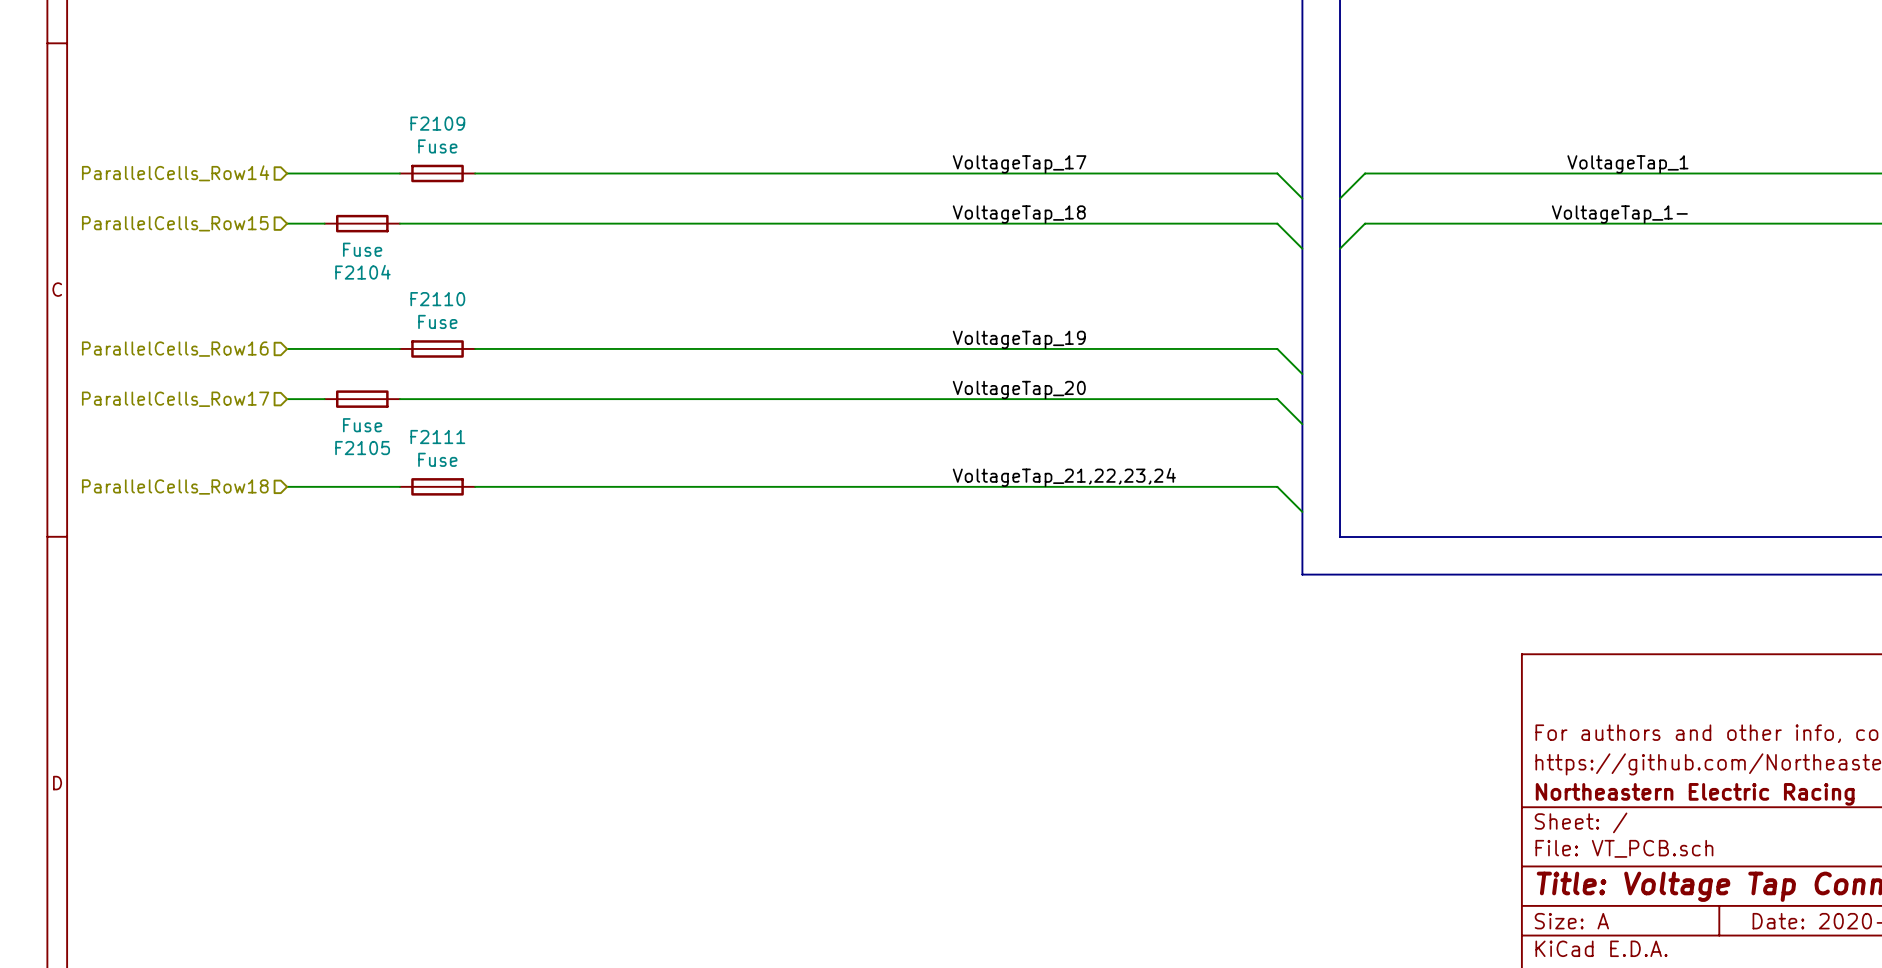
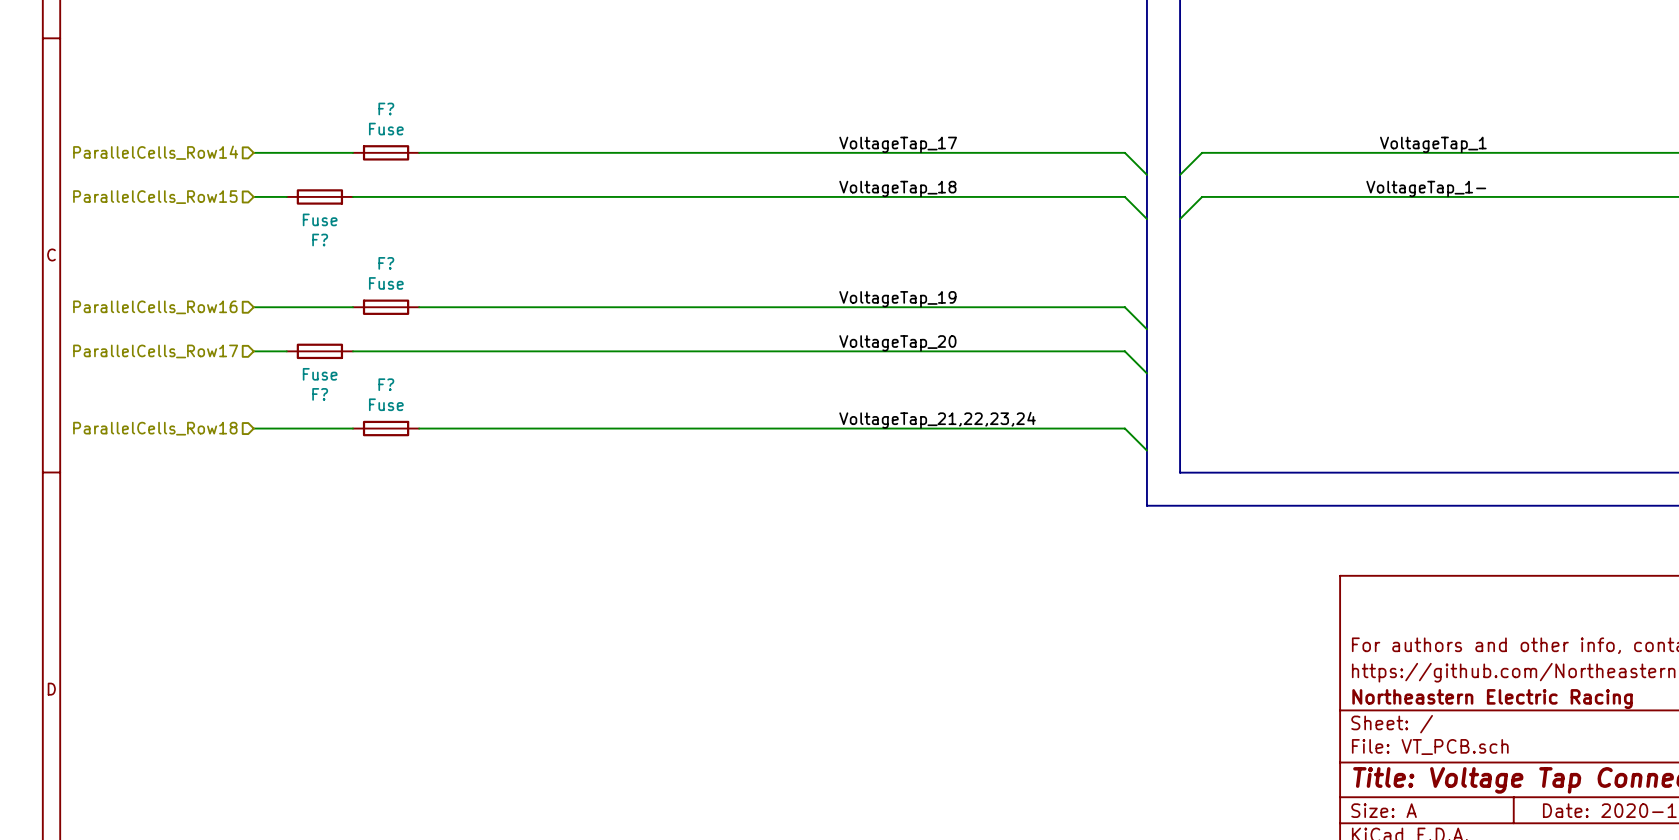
F2109 name: F2109 (437, 123) -> F? (386, 108)
F2104 name: F2104 (362, 272) -> F? (320, 240)
F2110 name: F2110 (437, 299) -> F? (386, 263)
F2111 name: F2111 (437, 437) -> F? (386, 384)
F2105 name: F2105 (362, 448) -> F? (320, 394)

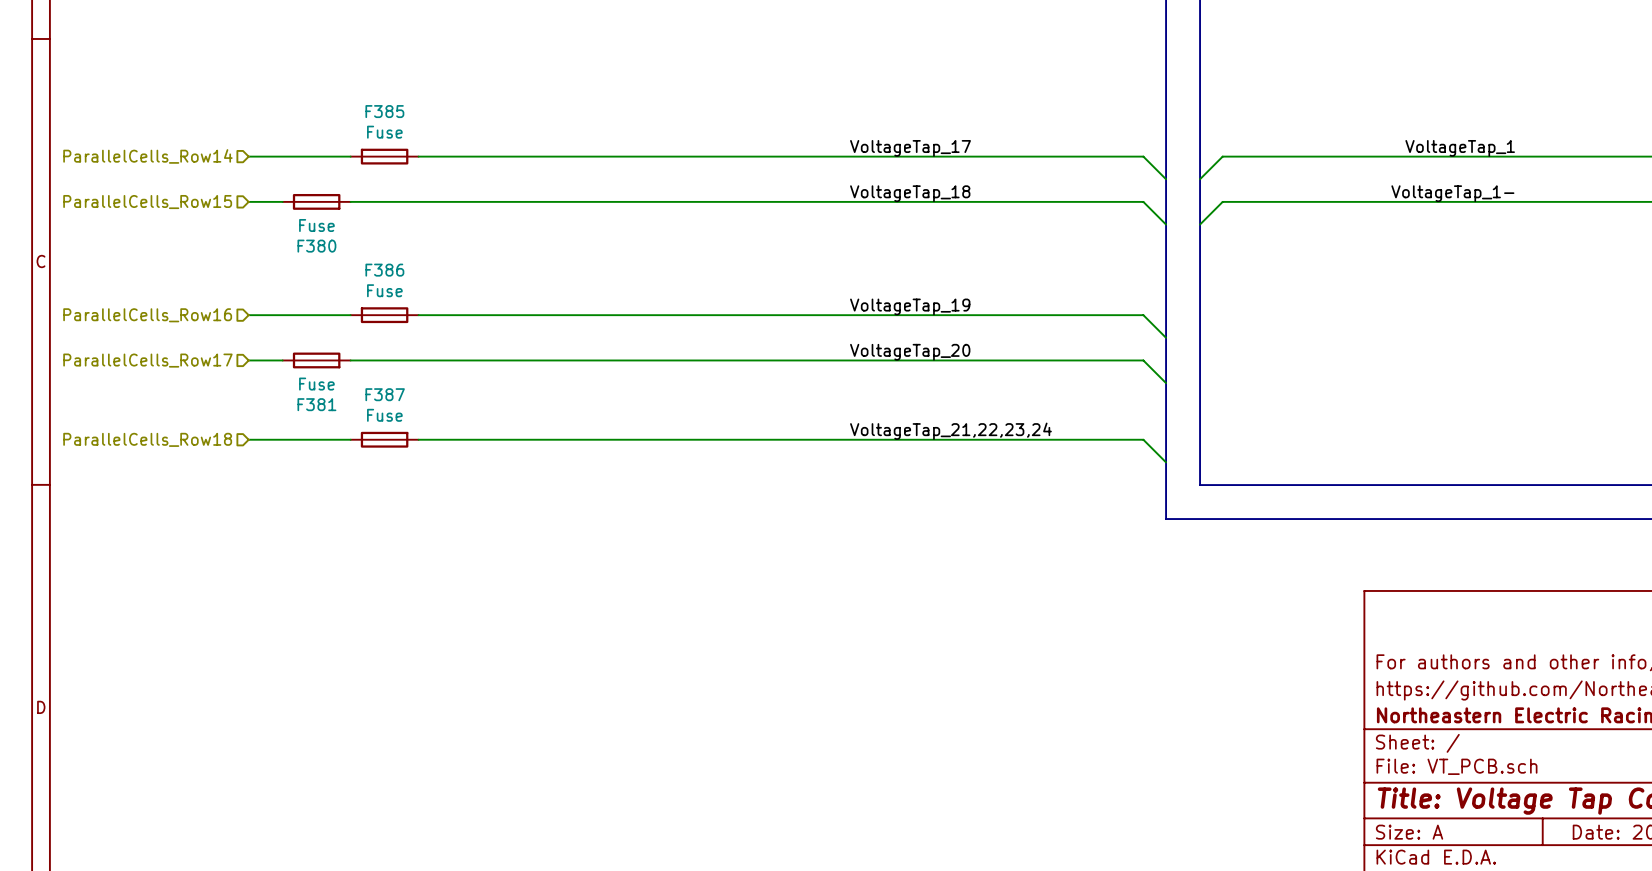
F? name: F? (386, 108) -> F385 (384, 111)
F? name: F? (320, 240) -> F380 (316, 246)
F? name: F? (386, 263) -> F386 (384, 270)
F? name: F? (386, 384) -> F387 (385, 394)
F? name: F? (320, 394) -> F381 (316, 404)

